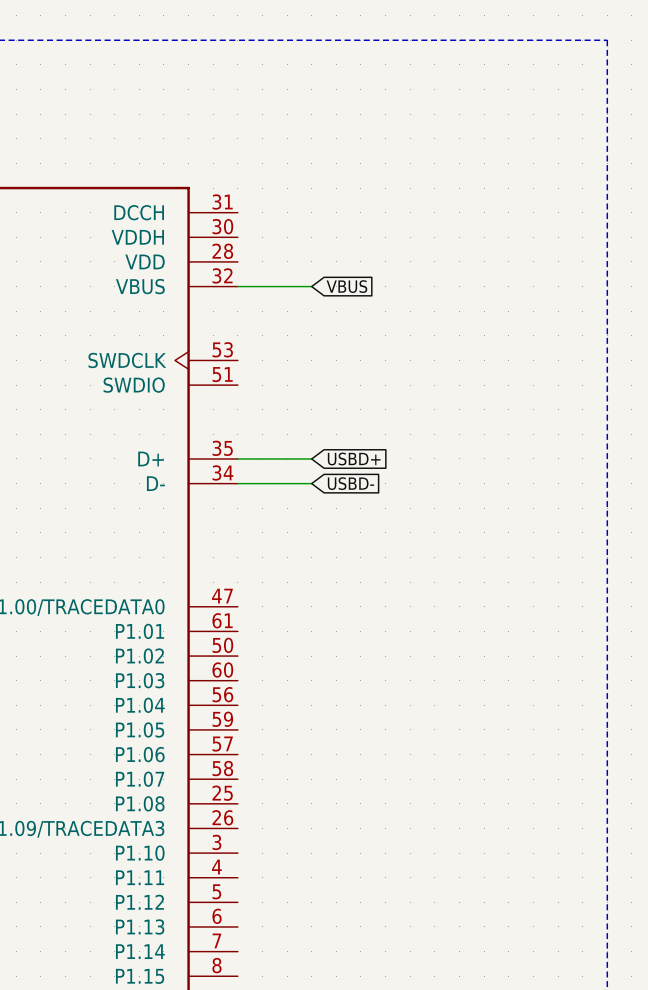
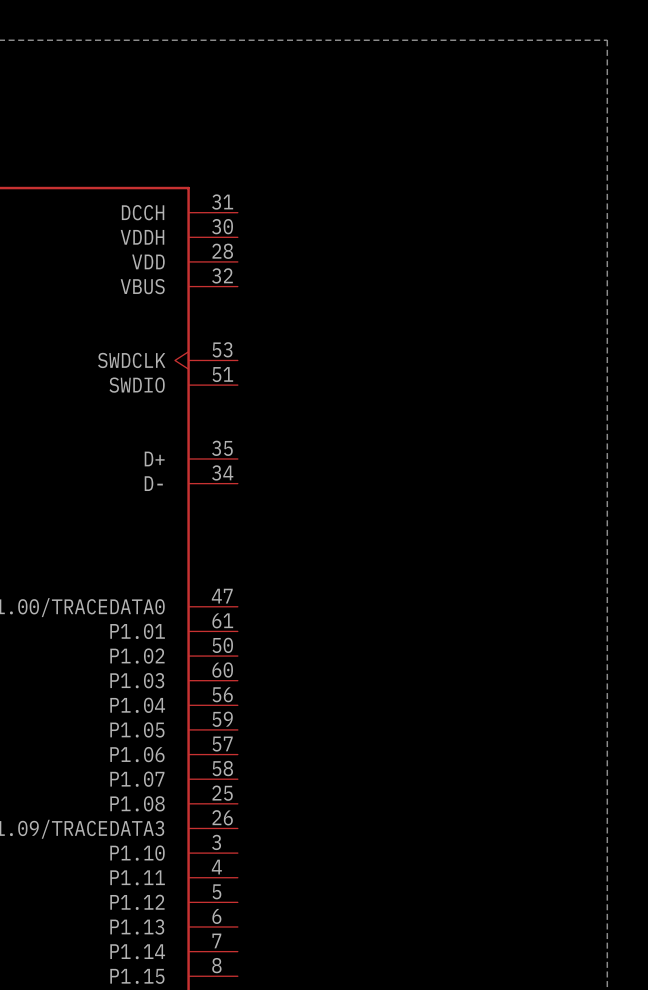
wire: (237, 286) (311, 286) -> none
global label: VBUS (346, 286) -> none
wire: (237, 458) (311, 458) -> none
global label: USBD+ (354, 459) -> none
wire: (237, 483) (311, 483) -> none
global label: USBD- (350, 483) -> none

